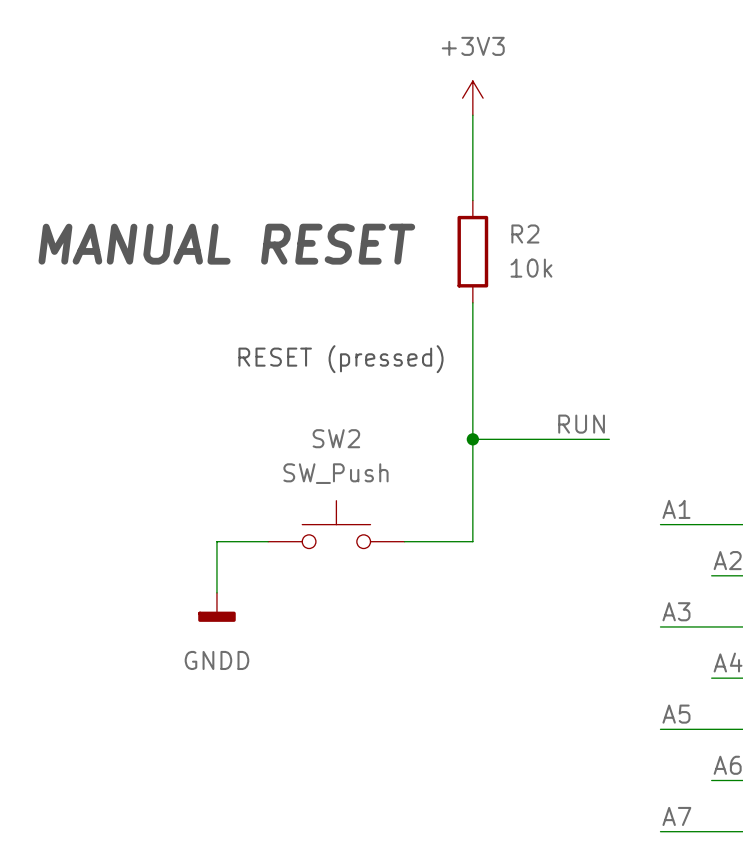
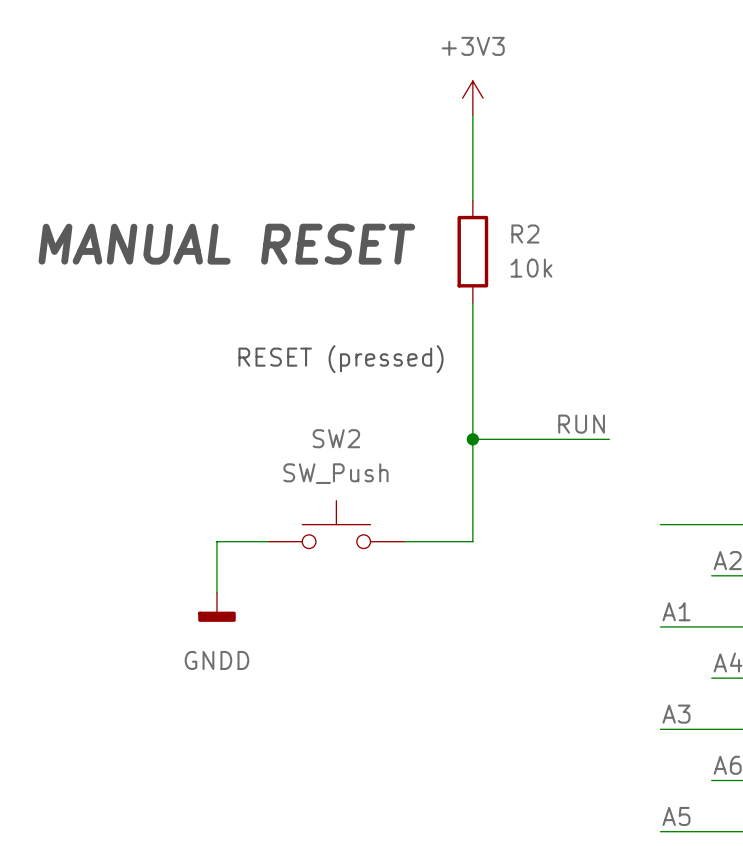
label: A1 (676, 509) -> none
label: A3 (676, 611) -> A1 (676, 611)
label: A5 (676, 714) -> A3 (676, 714)
label: A7 (676, 816) -> A5 (676, 816)

